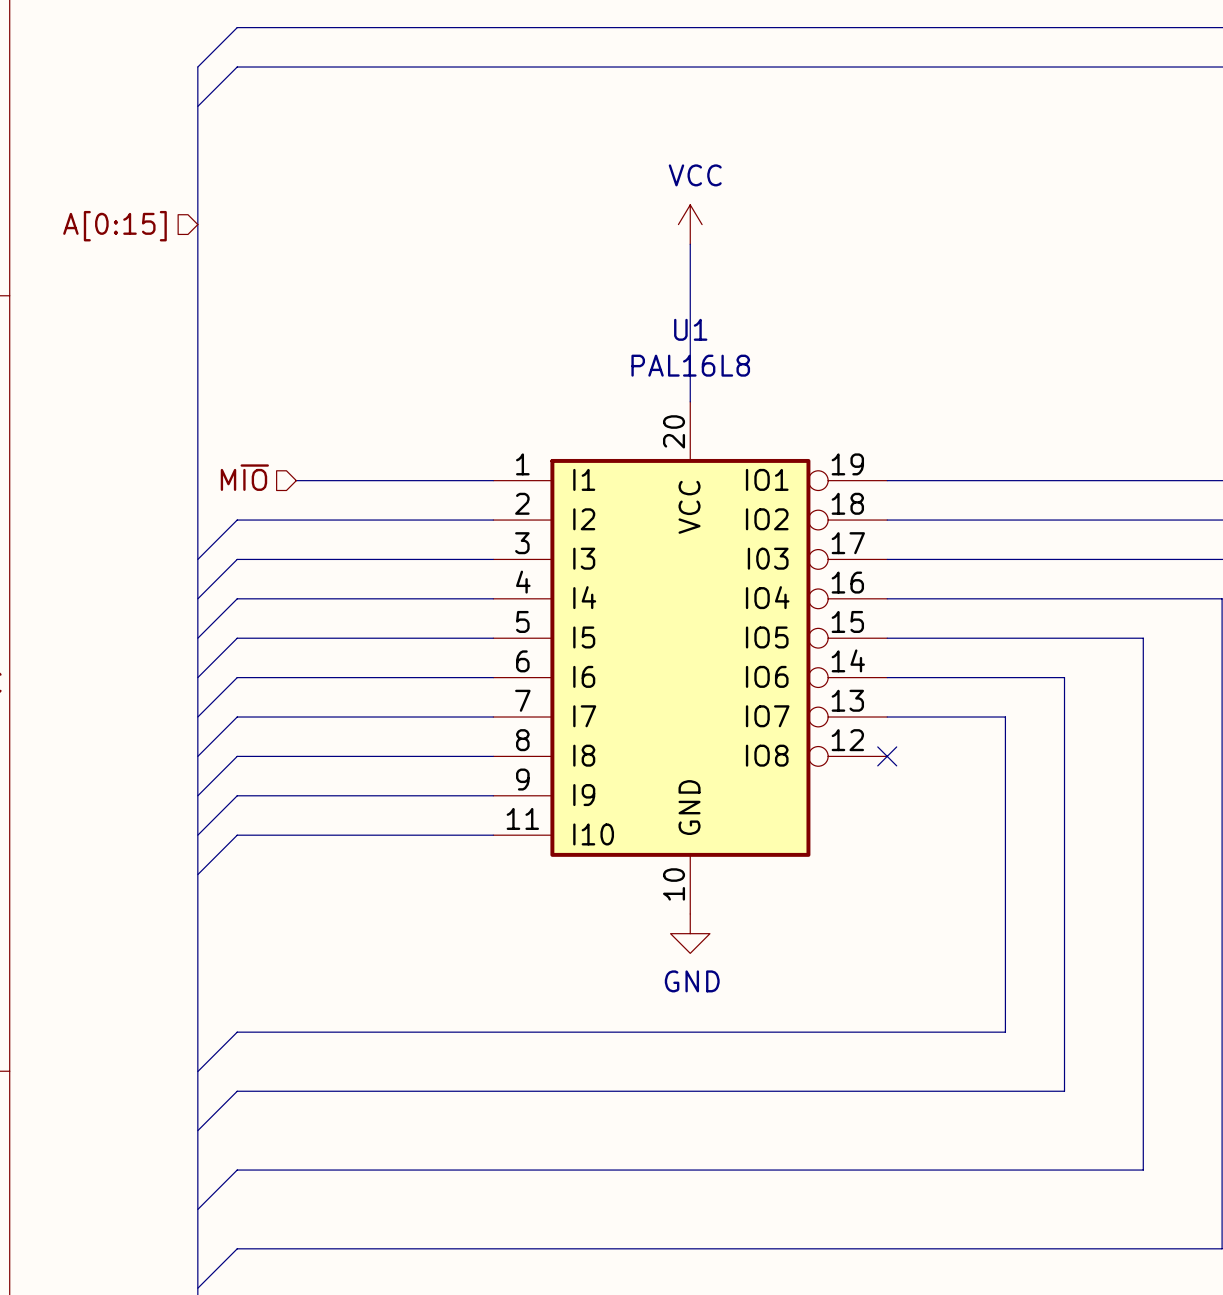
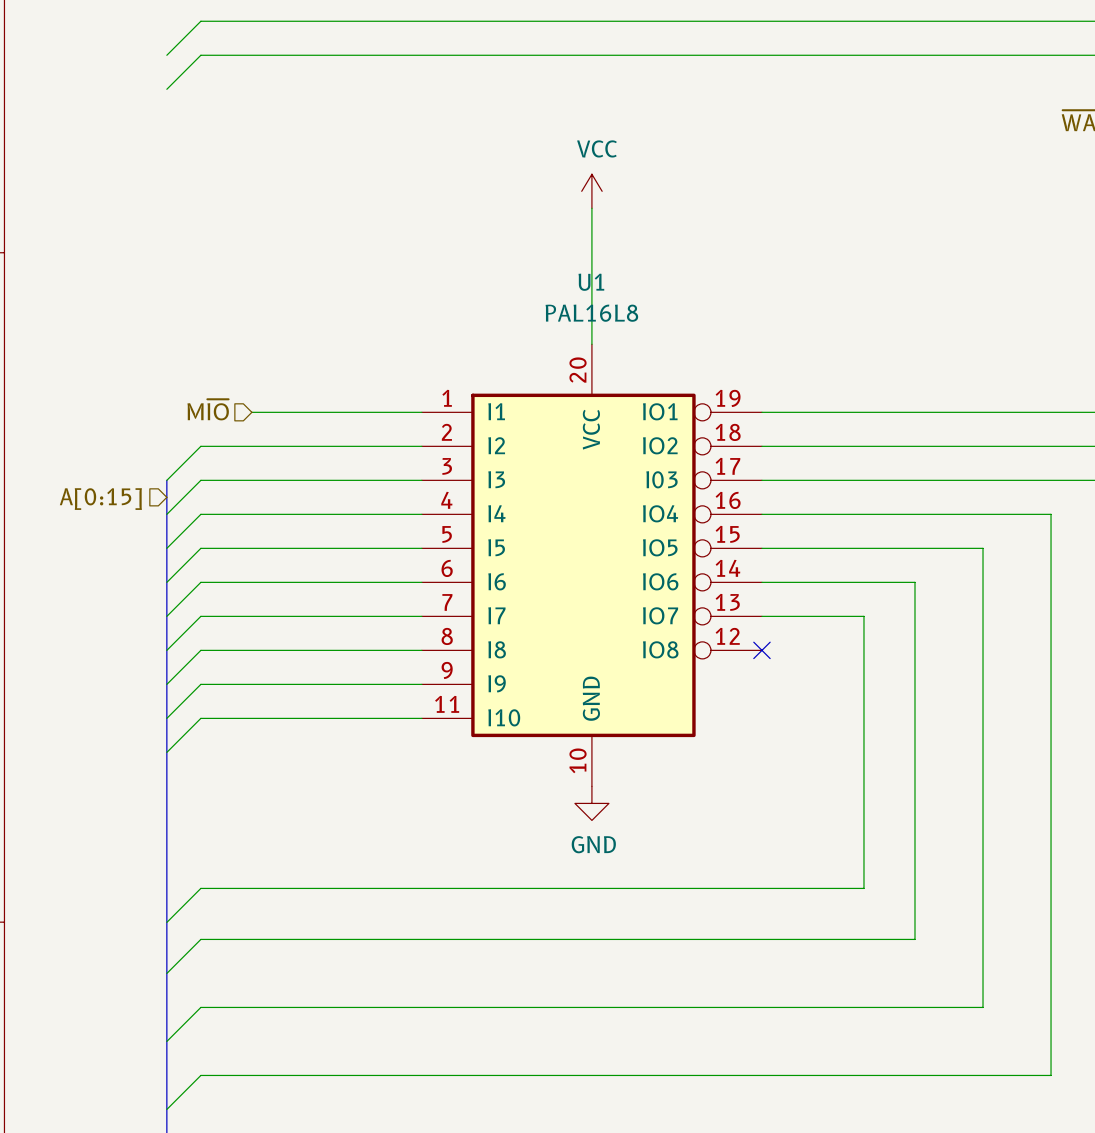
bus: (197, 67) (197, 559) -> none
hierarchical label position: A[0:15] (114, 226) -> A[0:15] (100, 499)

